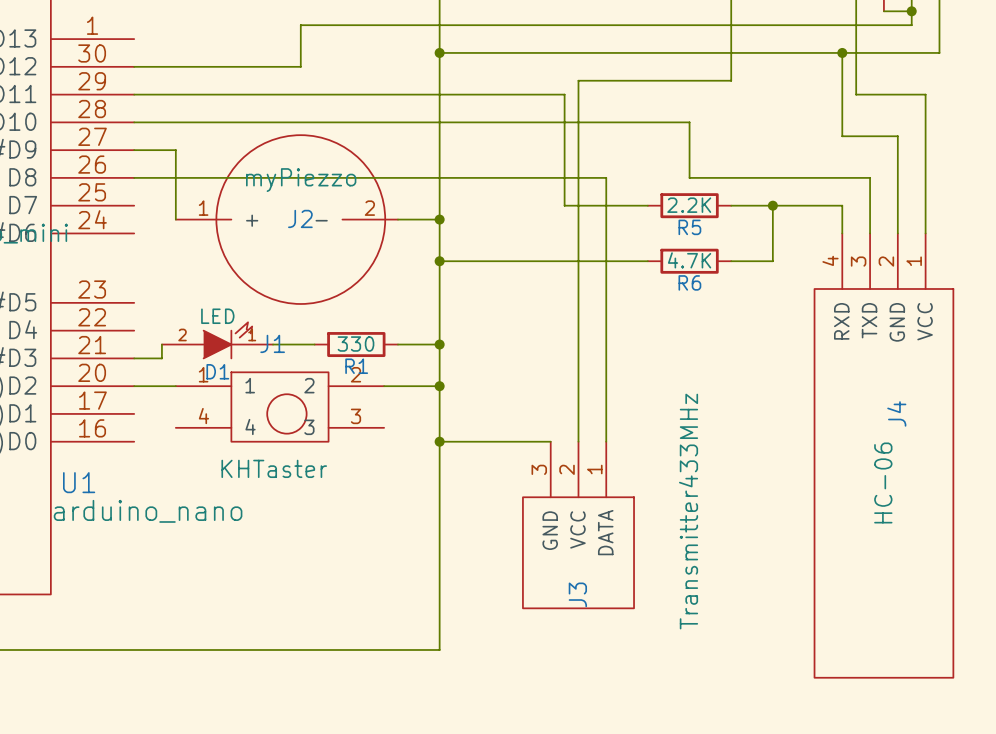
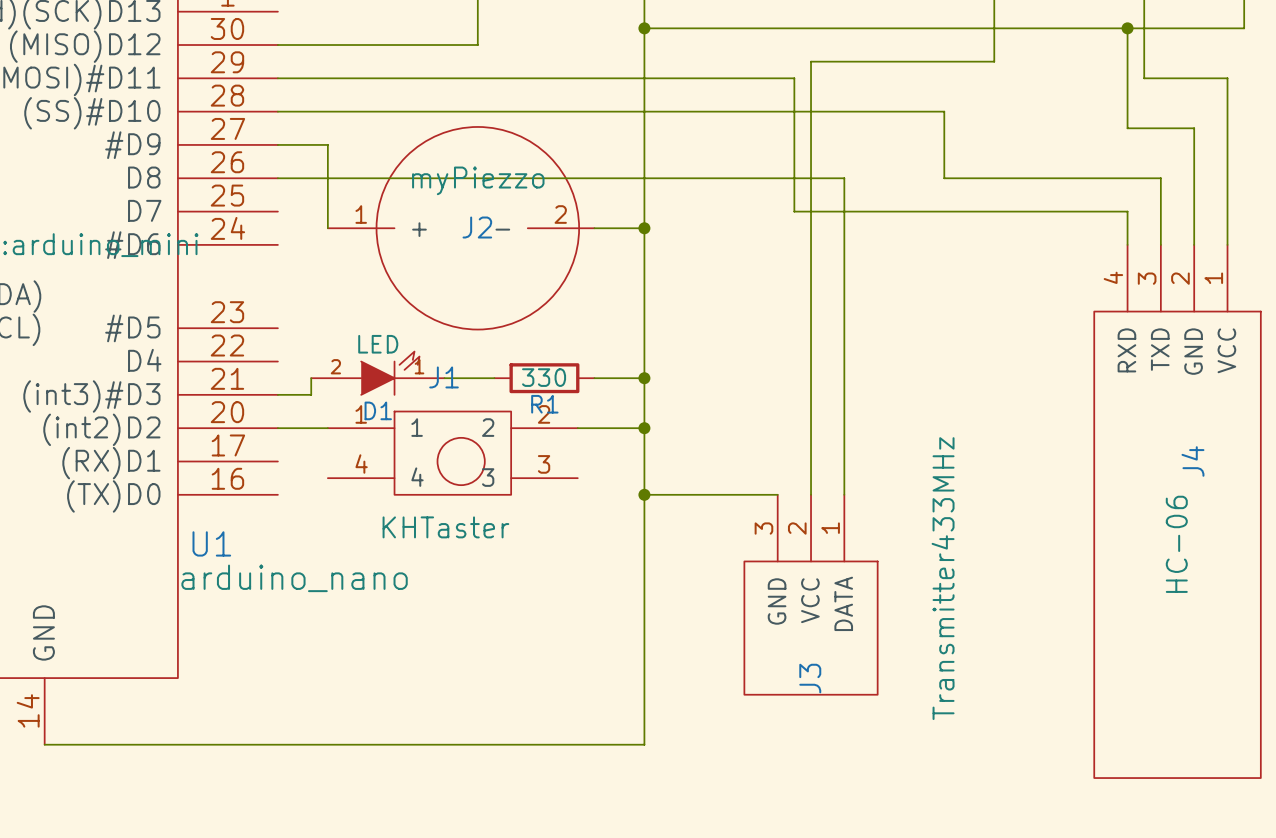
wire: none -> (894, 211) (994, 211)
R5: 2.2K (689, 205) -> none
wire: (772, 205) (772, 261) (731, 261) -> none
junction: (772, 205) -> none
wire: (439, 261) (647, 261) -> none
junction: (439, 261) -> none
R6: 4.7K (689, 261) -> none

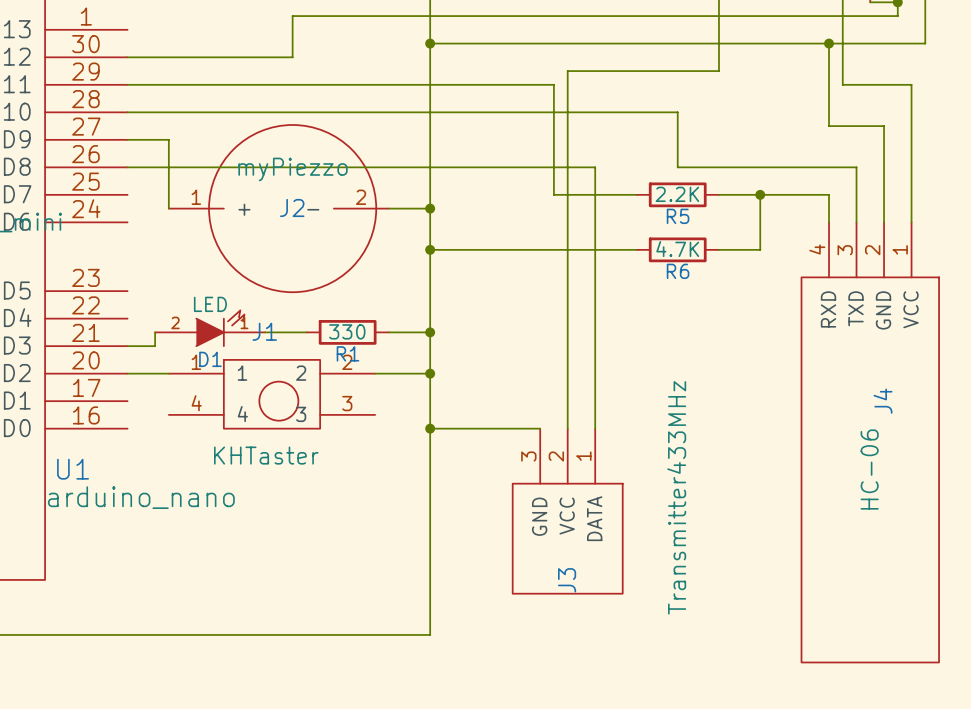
wire: (894, 211) (994, 211) -> none
R5: none -> 2.2K (677, 194)
wire: none -> (760, 194) (760, 249) (718, 249)
junction: none -> (760, 194)
wire: none -> (430, 249) (636, 249)
junction: none -> (430, 249)
R6: none -> 4.7K (677, 249)

